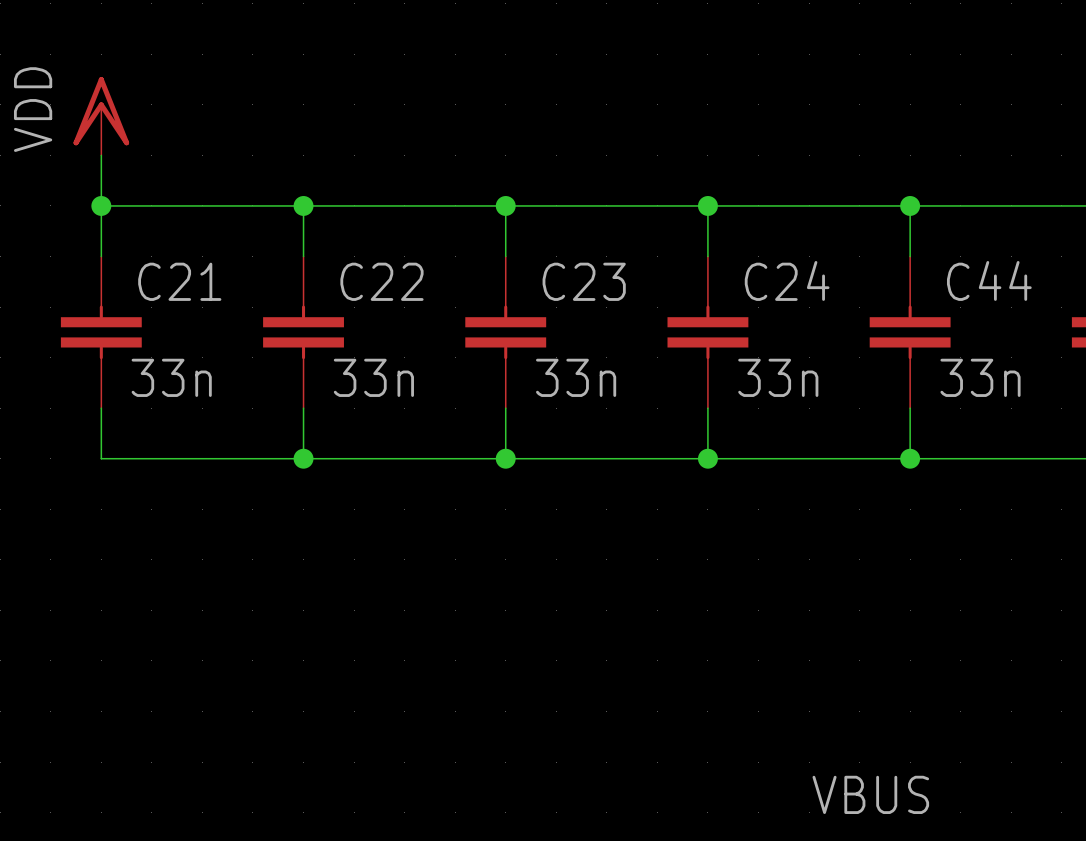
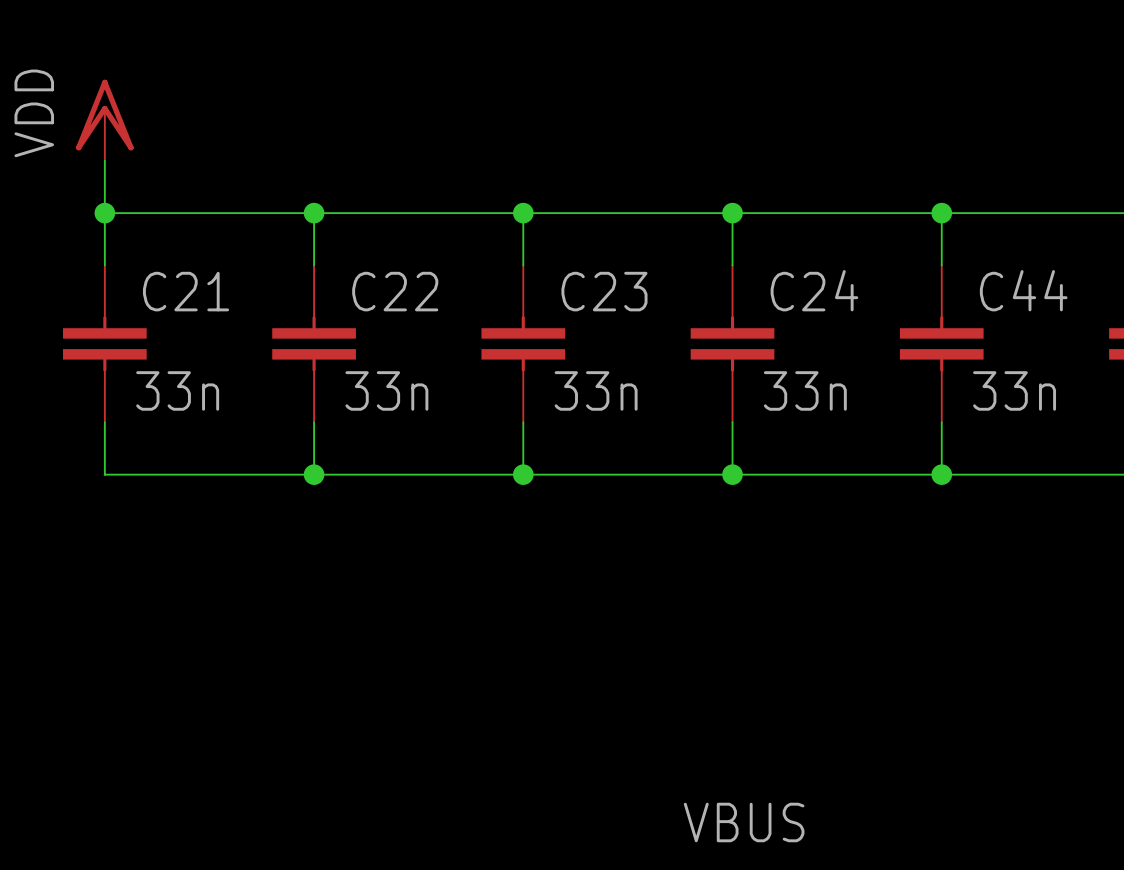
label position: VBUS (870, 794) -> VBUS (744, 822)

